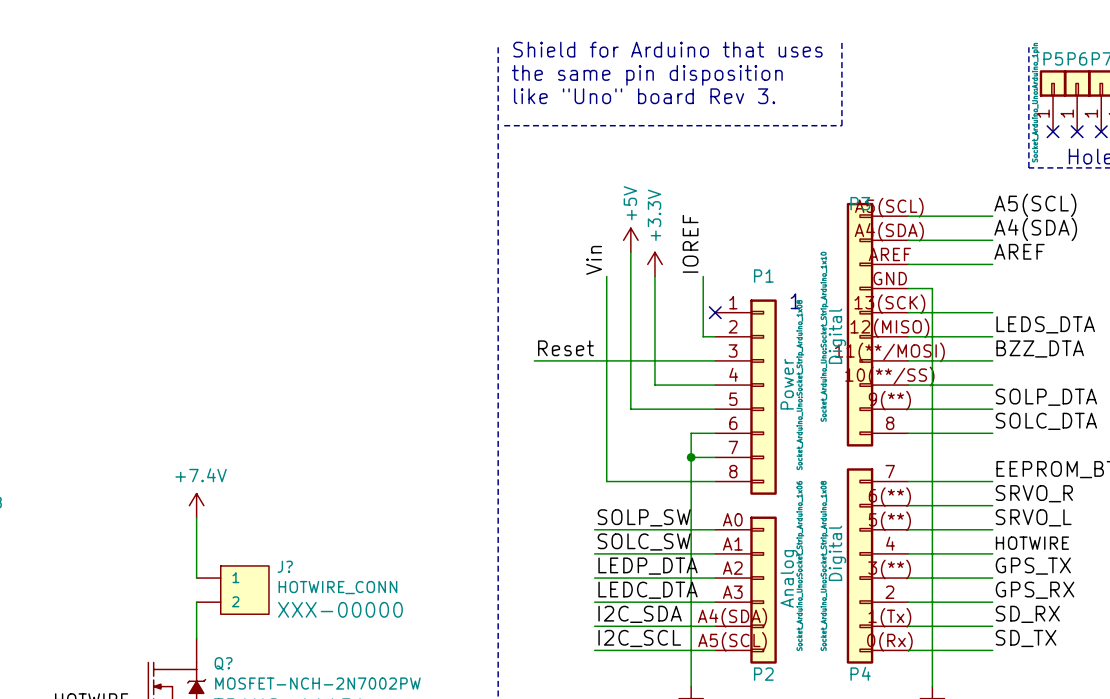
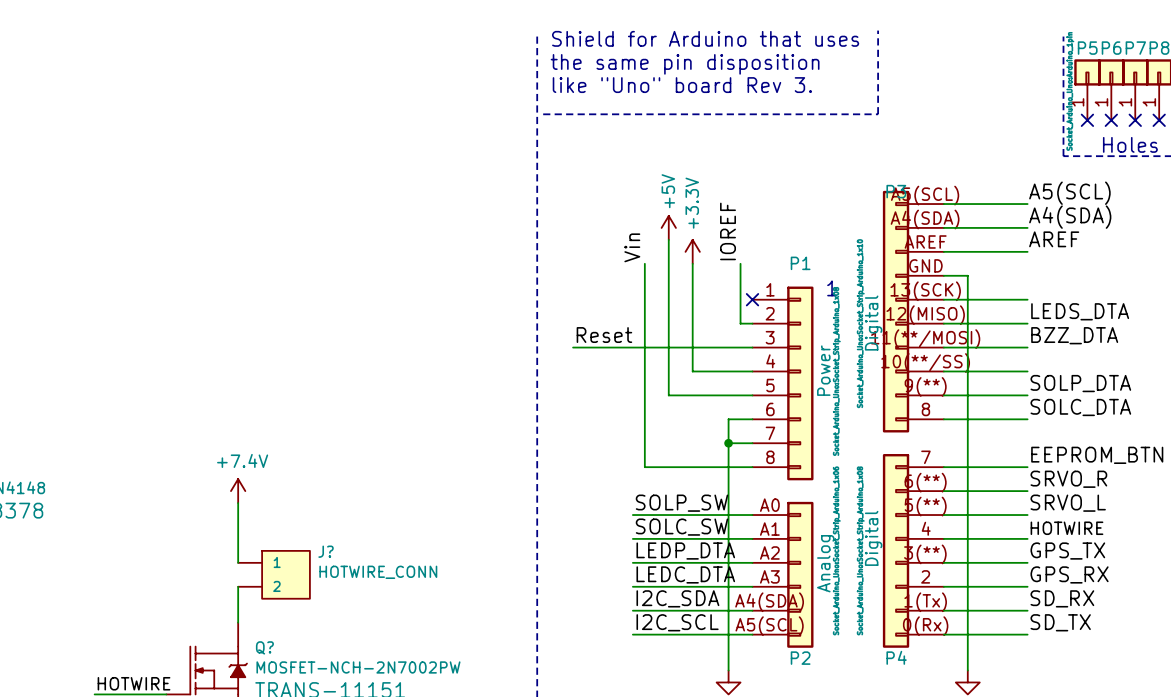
J? text: XXX-00000 (340, 609) -> none

